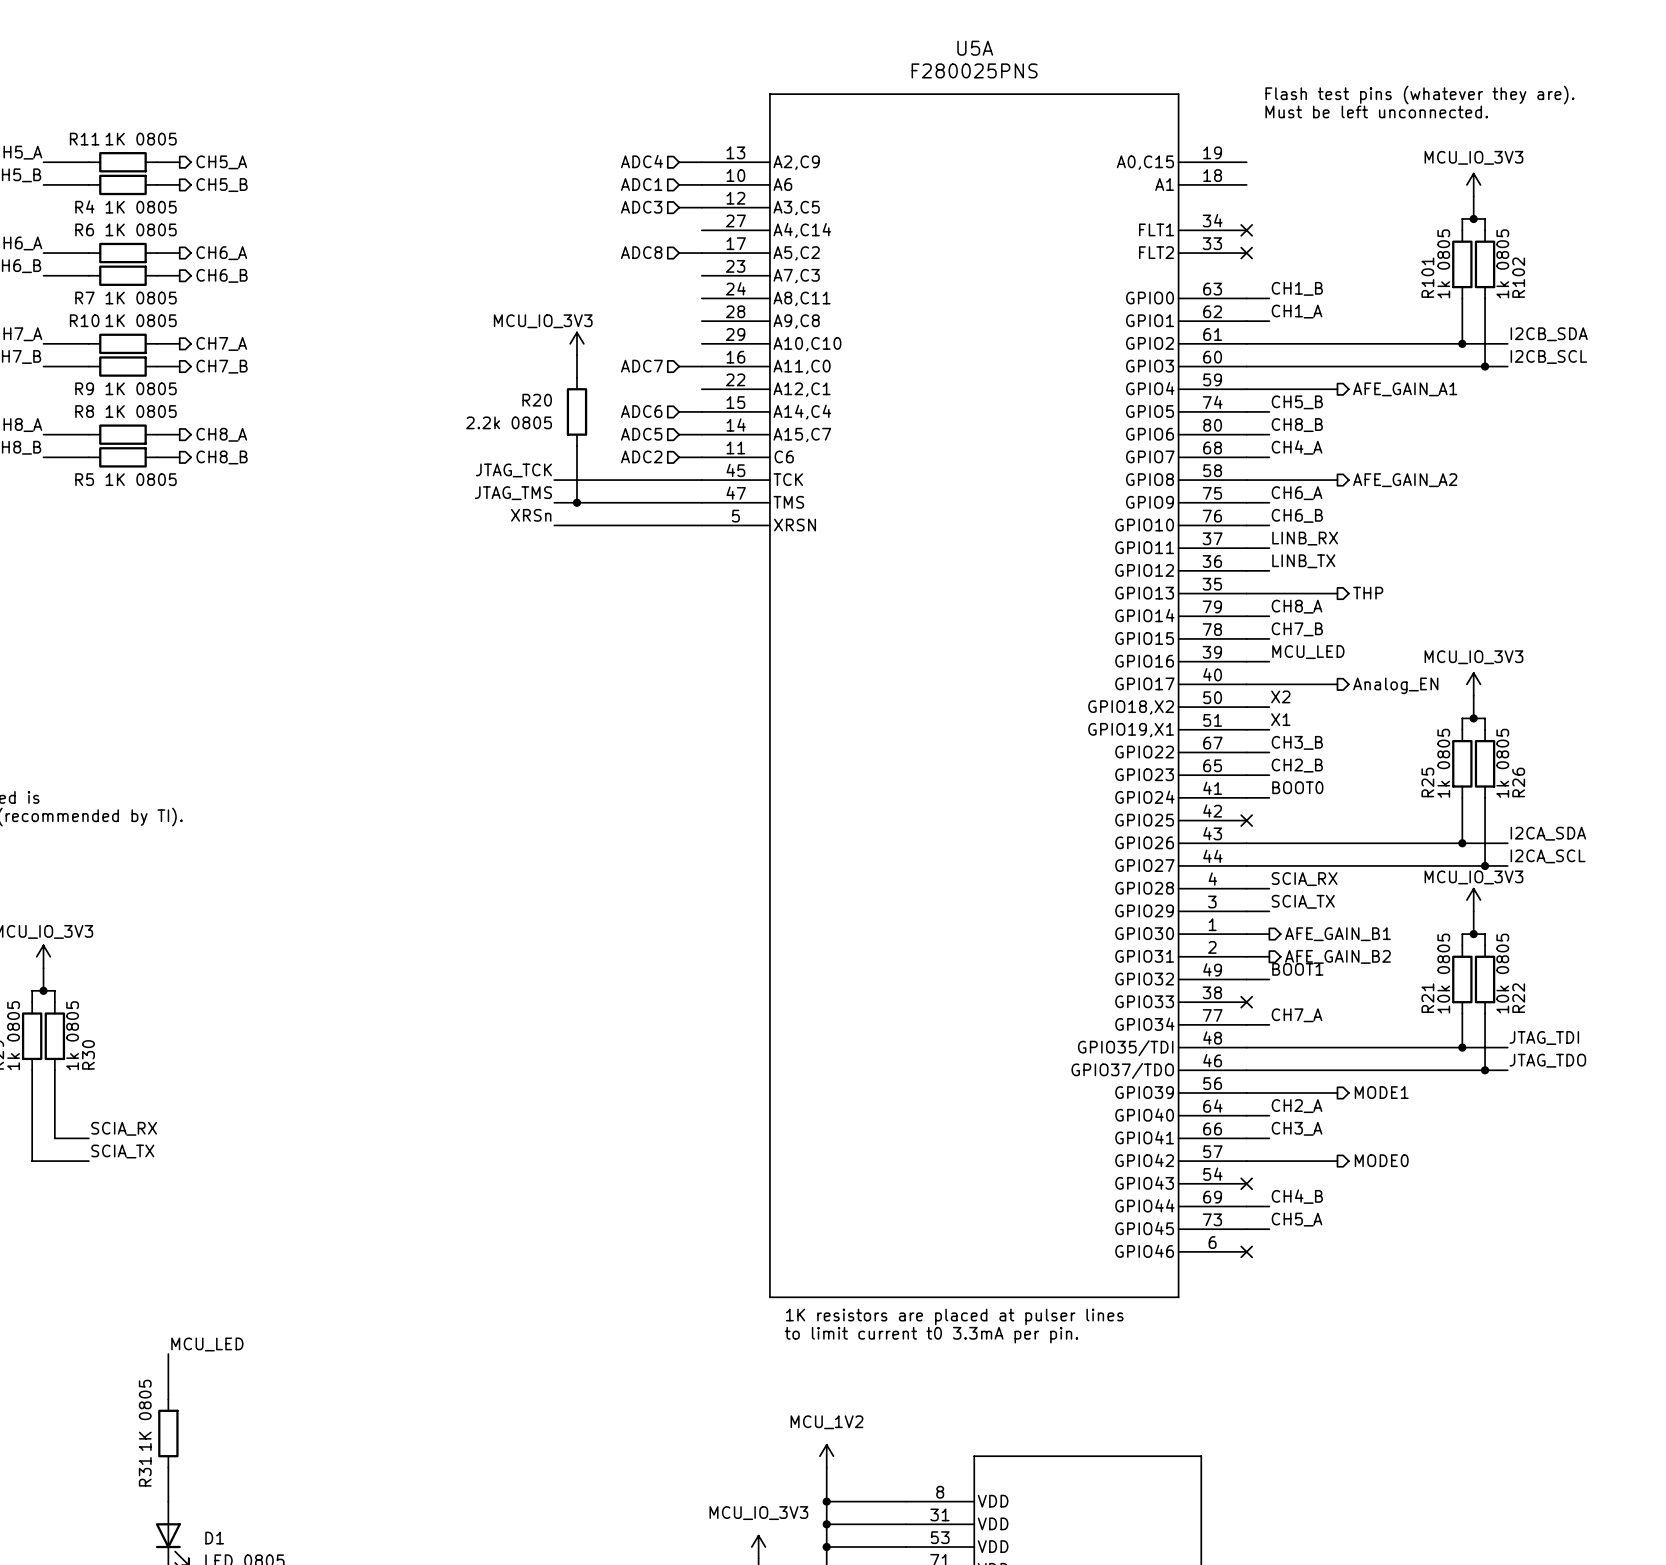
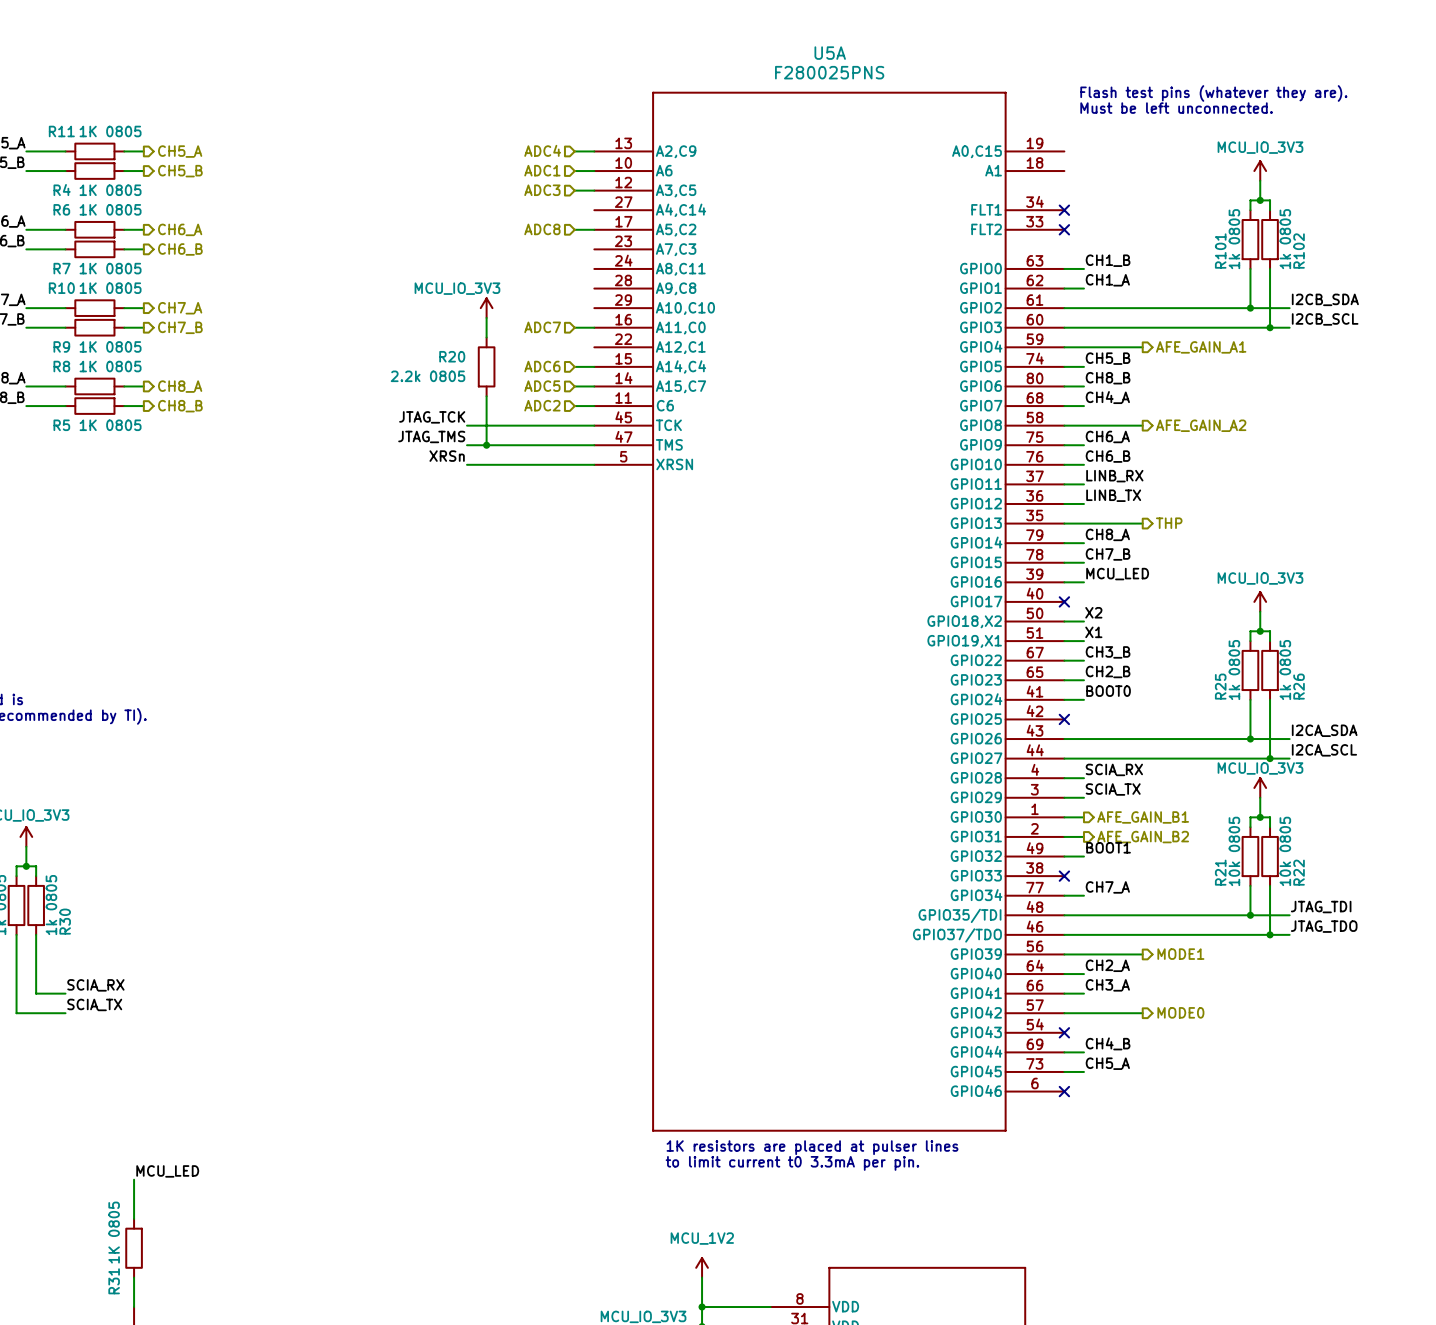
wire: (1246, 684) (1337, 684) -> none
no-connect mark: none -> (1064, 601)
hierarchical label: Analog_EN (1395, 685) -> none

